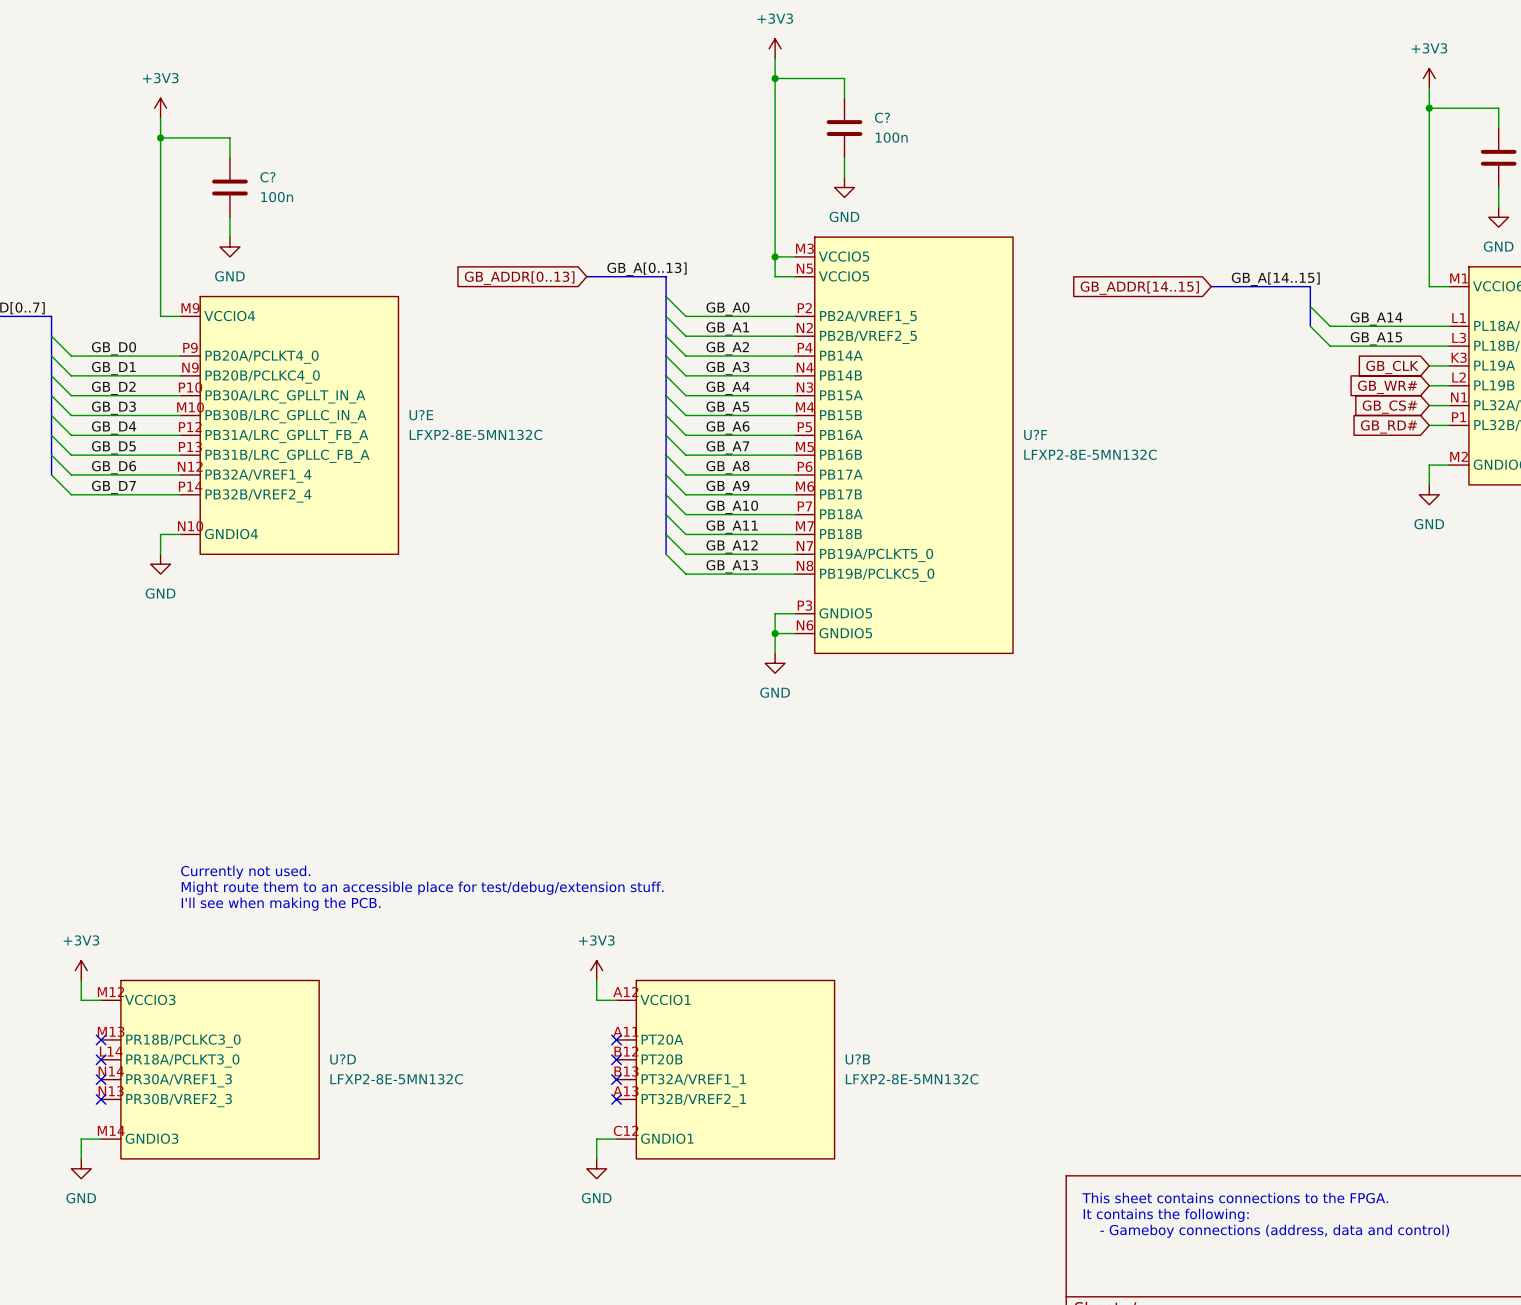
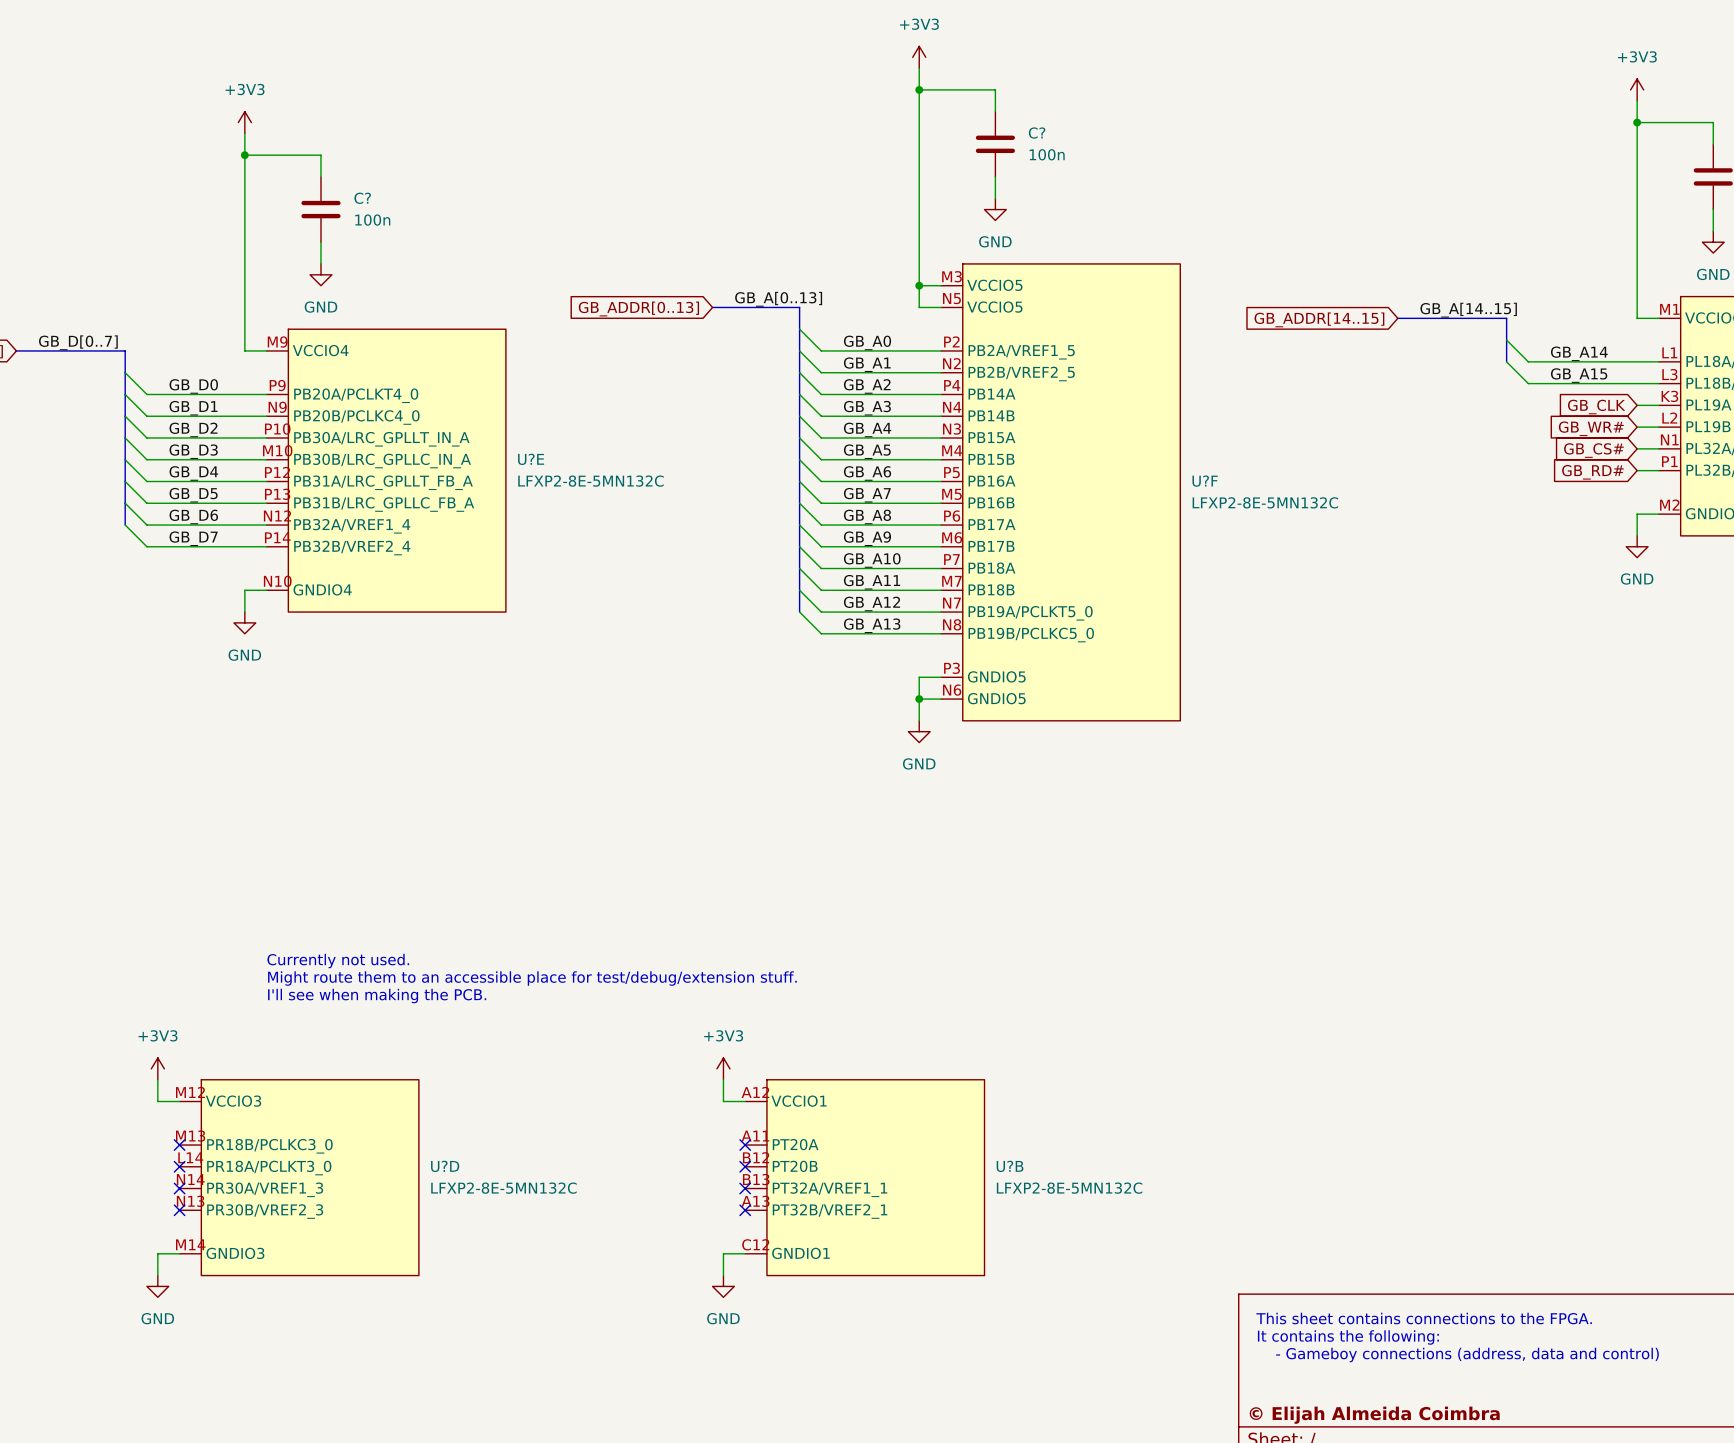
title block: none -> © Elijah Almeida Coimbra (1374, 1415)

